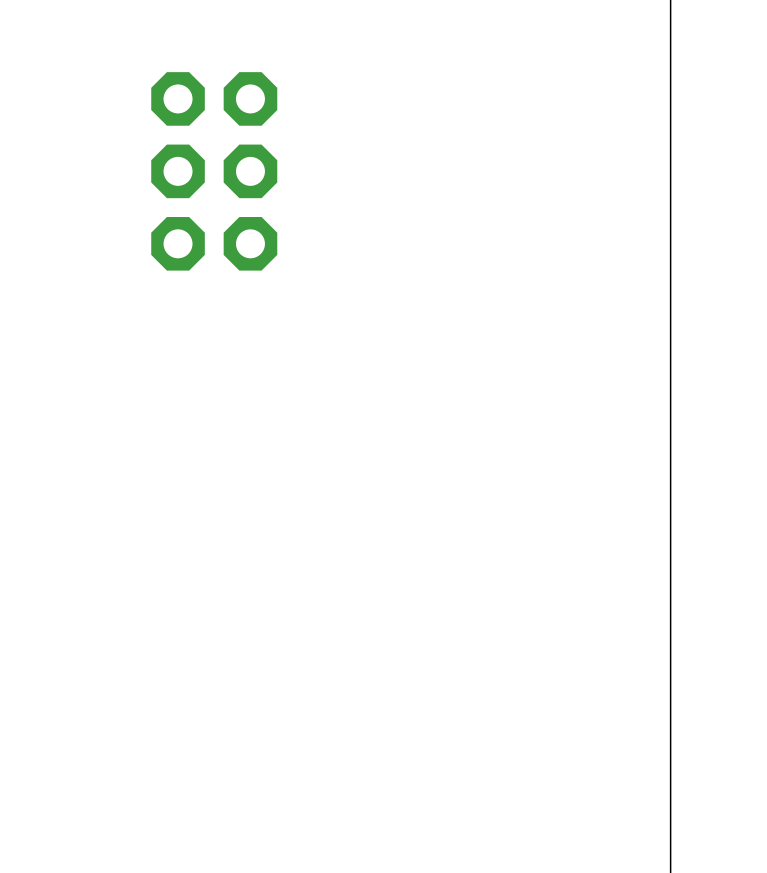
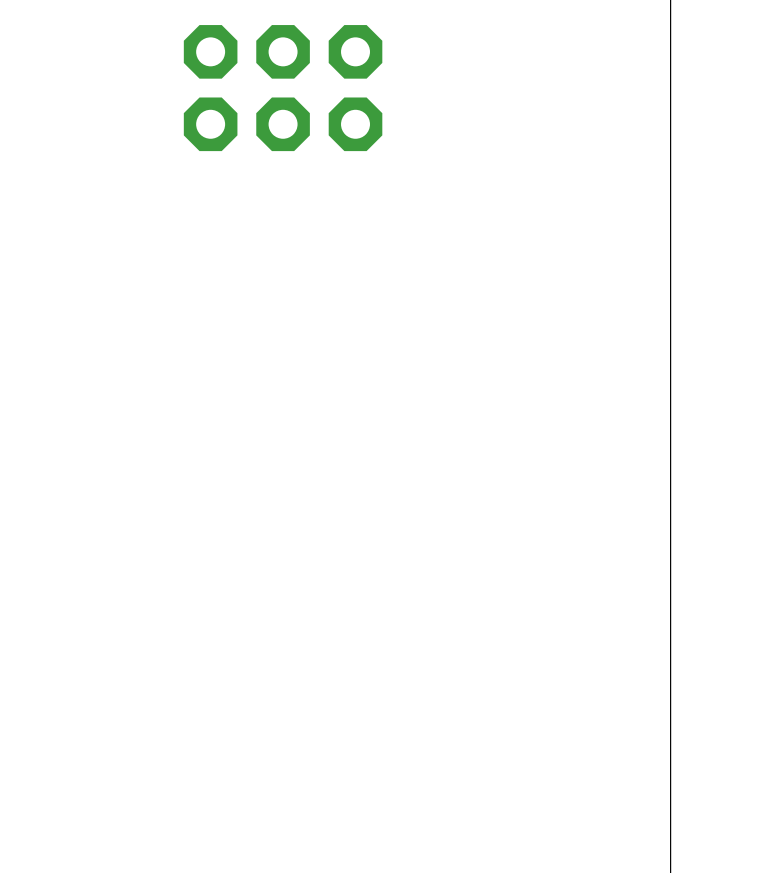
part rotation: 0° (214, 171) -> 90° clockwise (283, 88)

